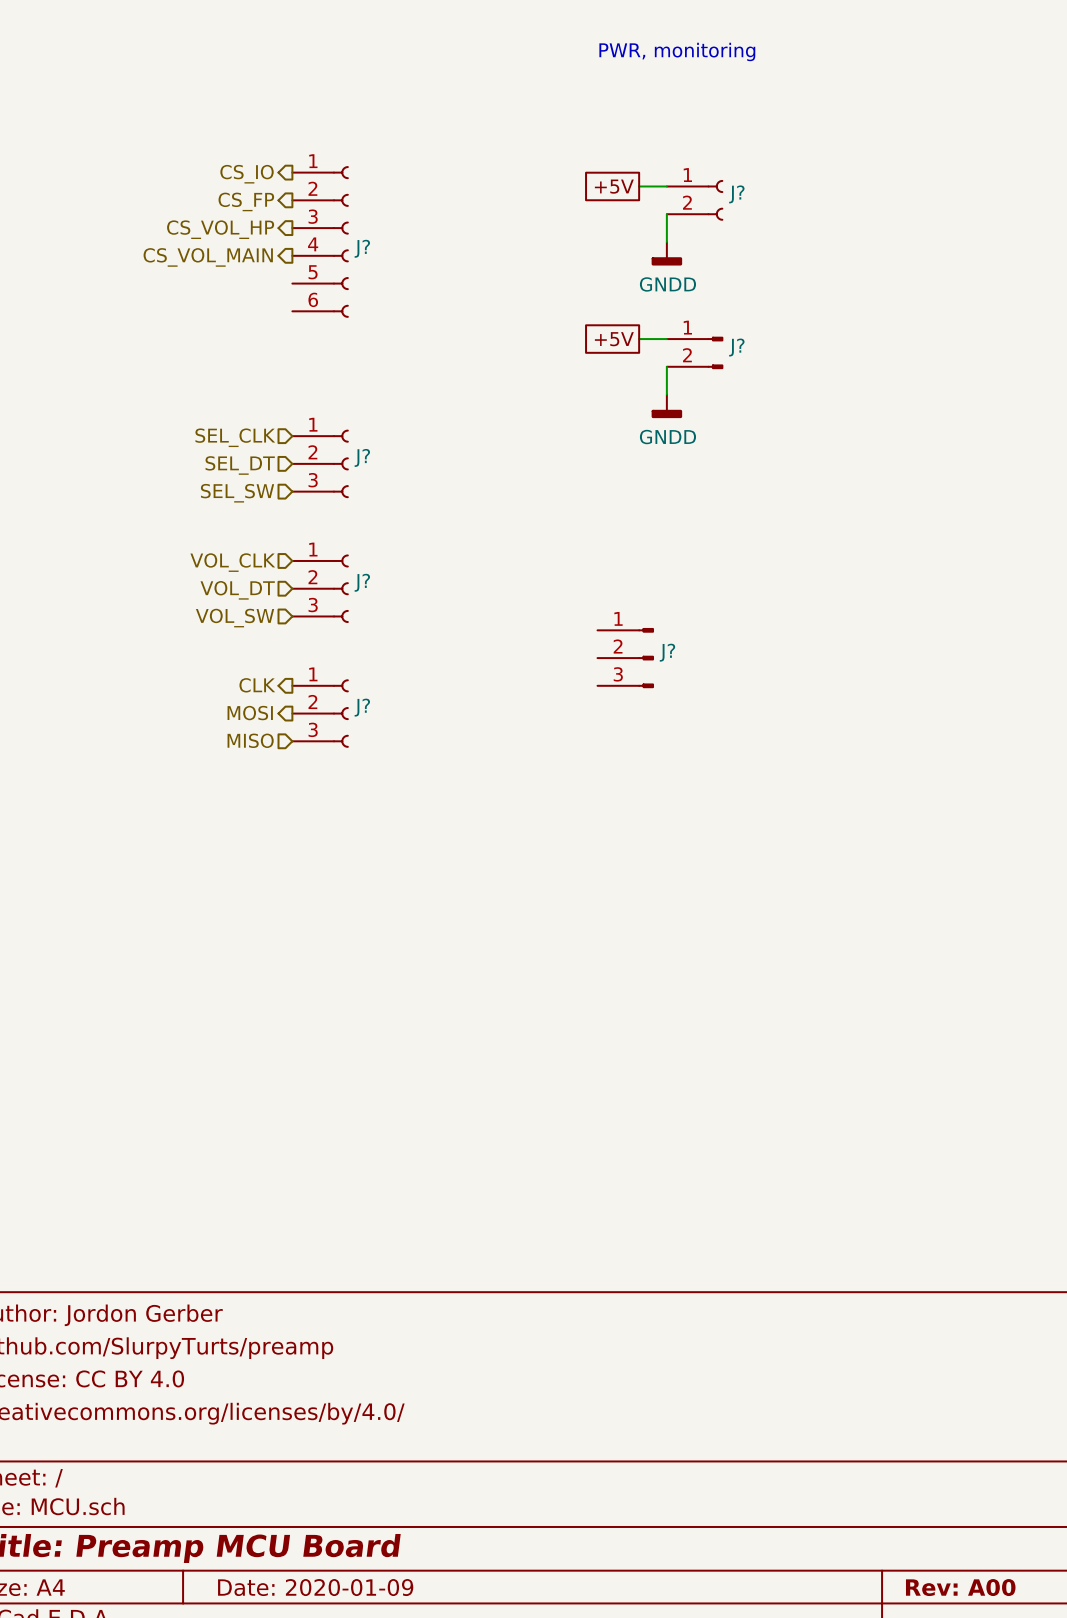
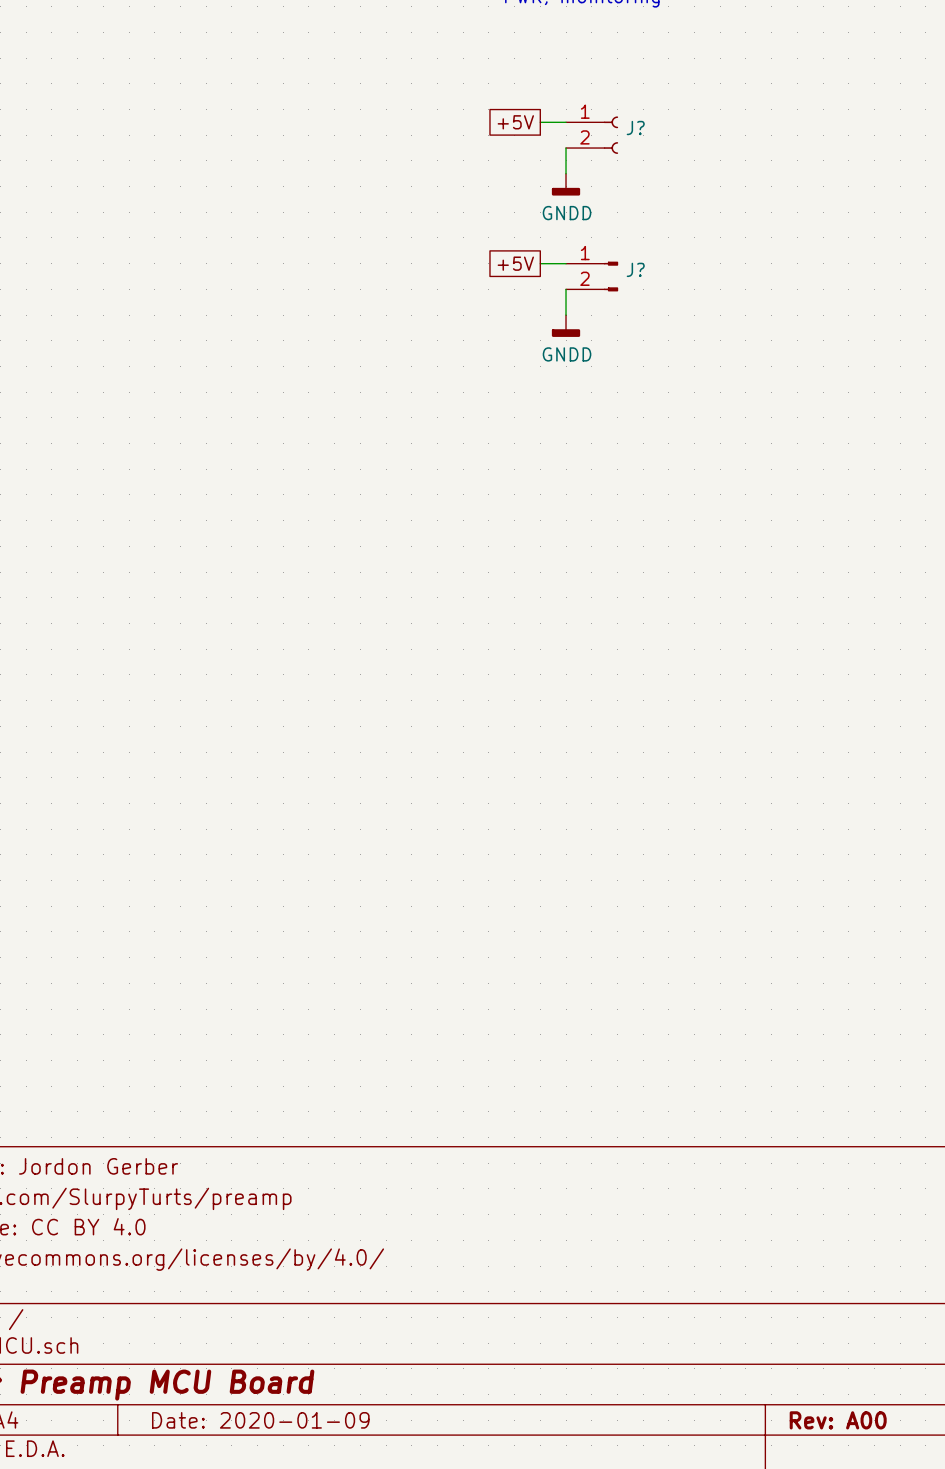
hierarchical label: CS_IO (247, 174) -> none
hierarchical label: CS_FP (246, 201) -> none
hierarchical label: CS_VOL_HP (220, 229) -> none
J?: (320, 241) -> none
hierarchical label: CS_VOL_MAIN (208, 257) -> none
hierarchical label: SEL_CLK (235, 437) -> none
J?: (320, 463) -> none
hierarchical label: SEL_DT (240, 465) -> none
hierarchical label: SEL_SW (237, 493) -> none
hierarchical label: VOL_CLK (232, 562) -> none
J?: (320, 588) -> none
hierarchical label: VOL_DT (237, 590) -> none
hierarchical label: VOL_SW (235, 618) -> none
J?: (625, 658) -> none
hierarchical label: CLK (257, 685) -> none
hierarchical label: MOSI (250, 713) -> none
J?: (320, 713) -> none
hierarchical label: MISO (250, 740) -> none

